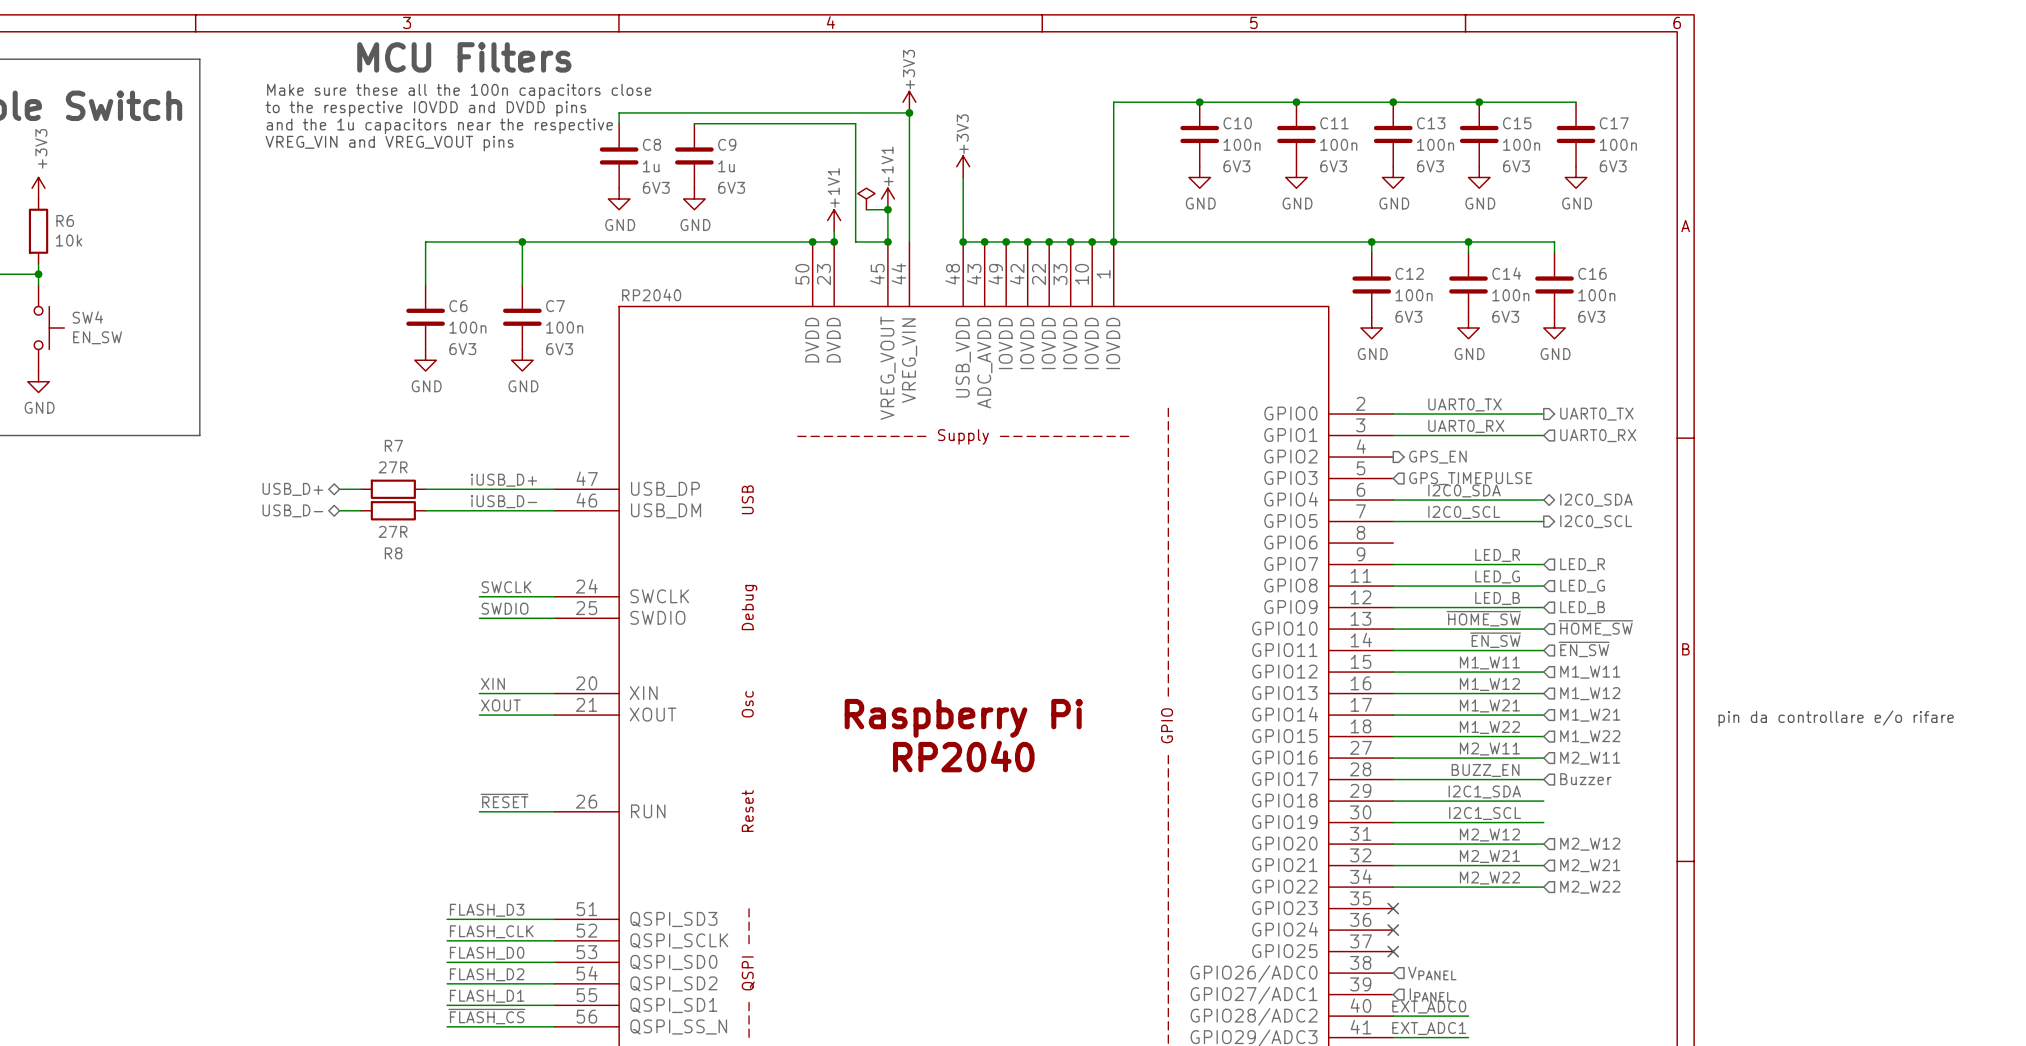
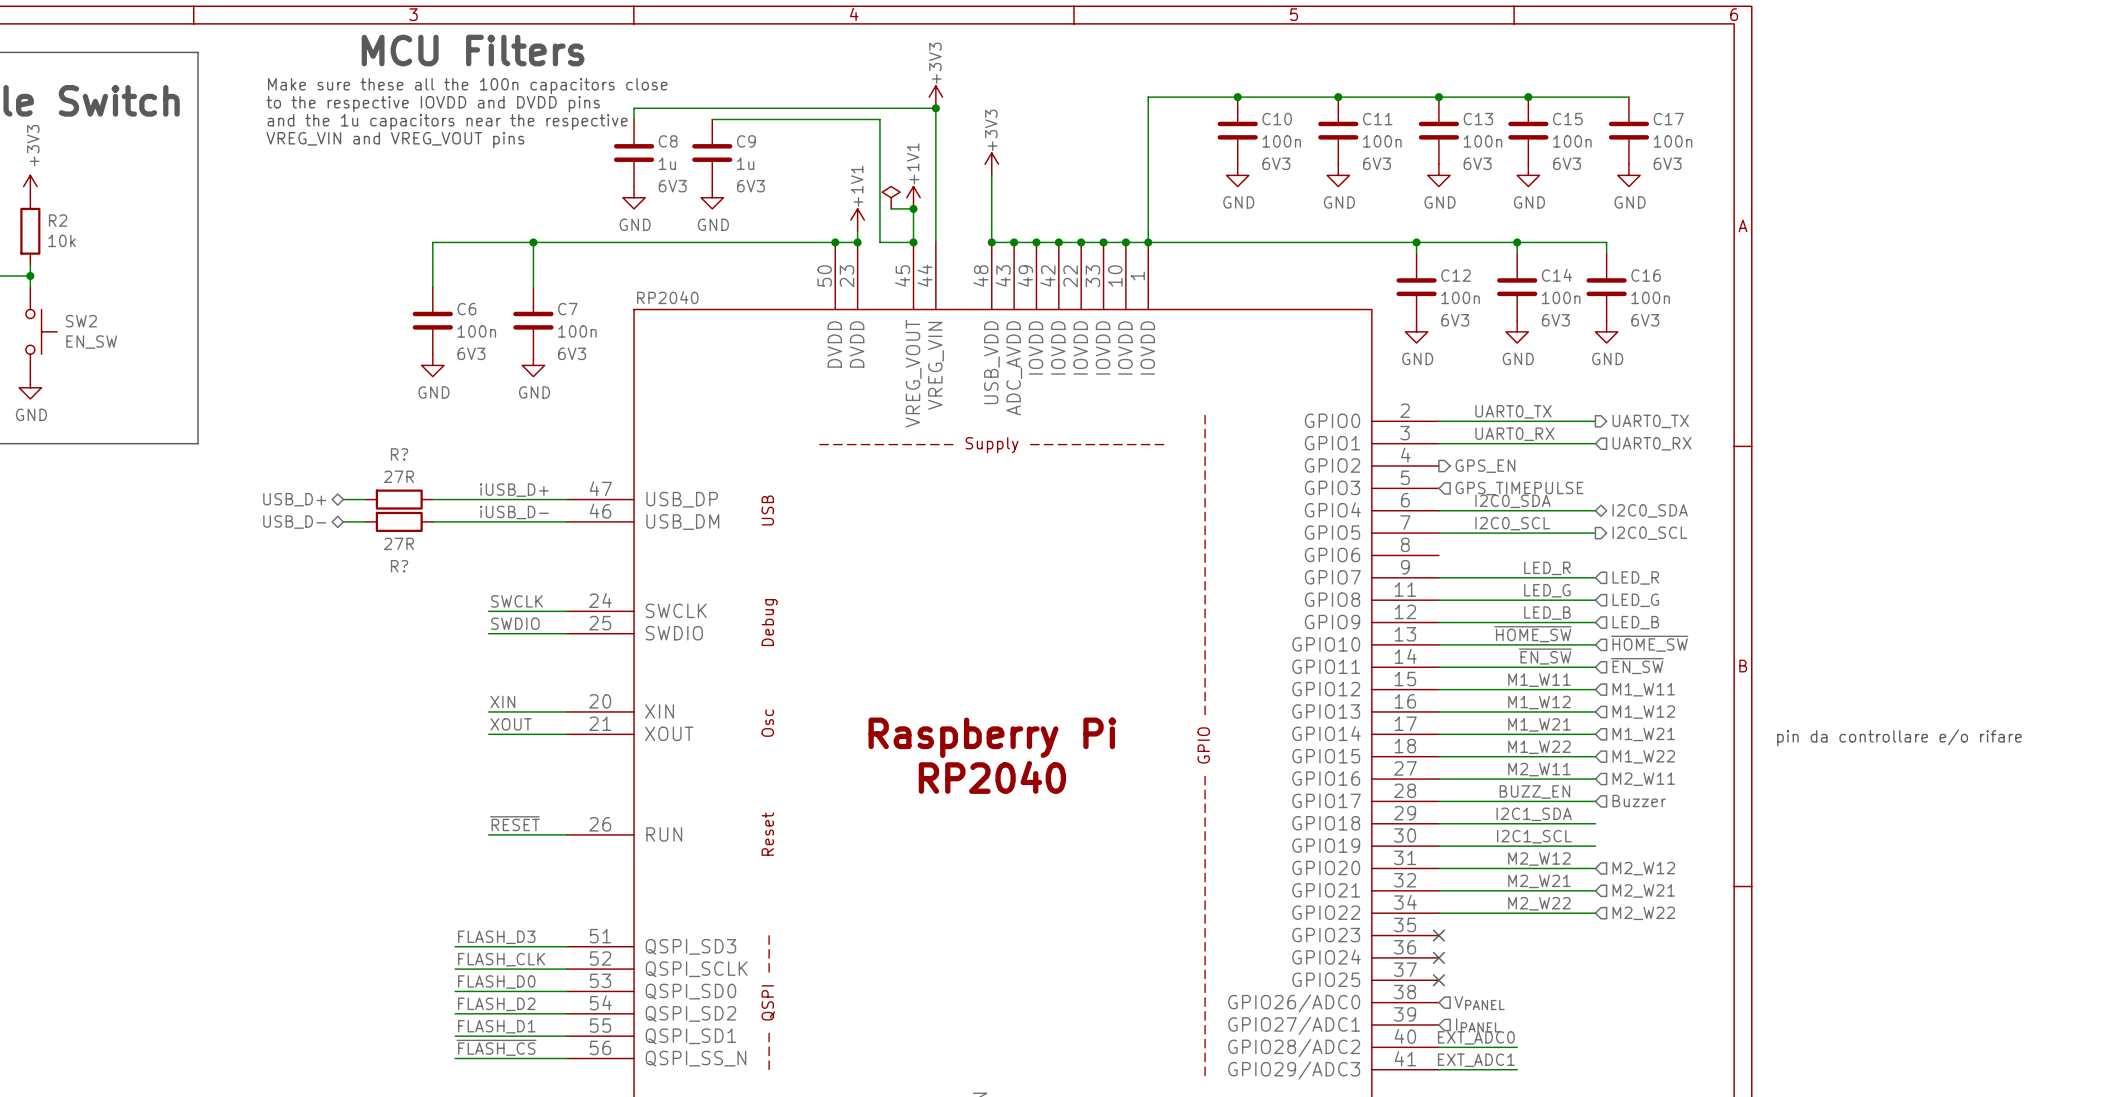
R6 name: R6 (65, 220) -> R2 (58, 220)
SW4 name: SW4 (87, 317) -> SW2 (81, 321)
R7 name: R7 (393, 445) -> R? (399, 454)
R8 name: R8 (393, 553) -> R? (399, 566)

